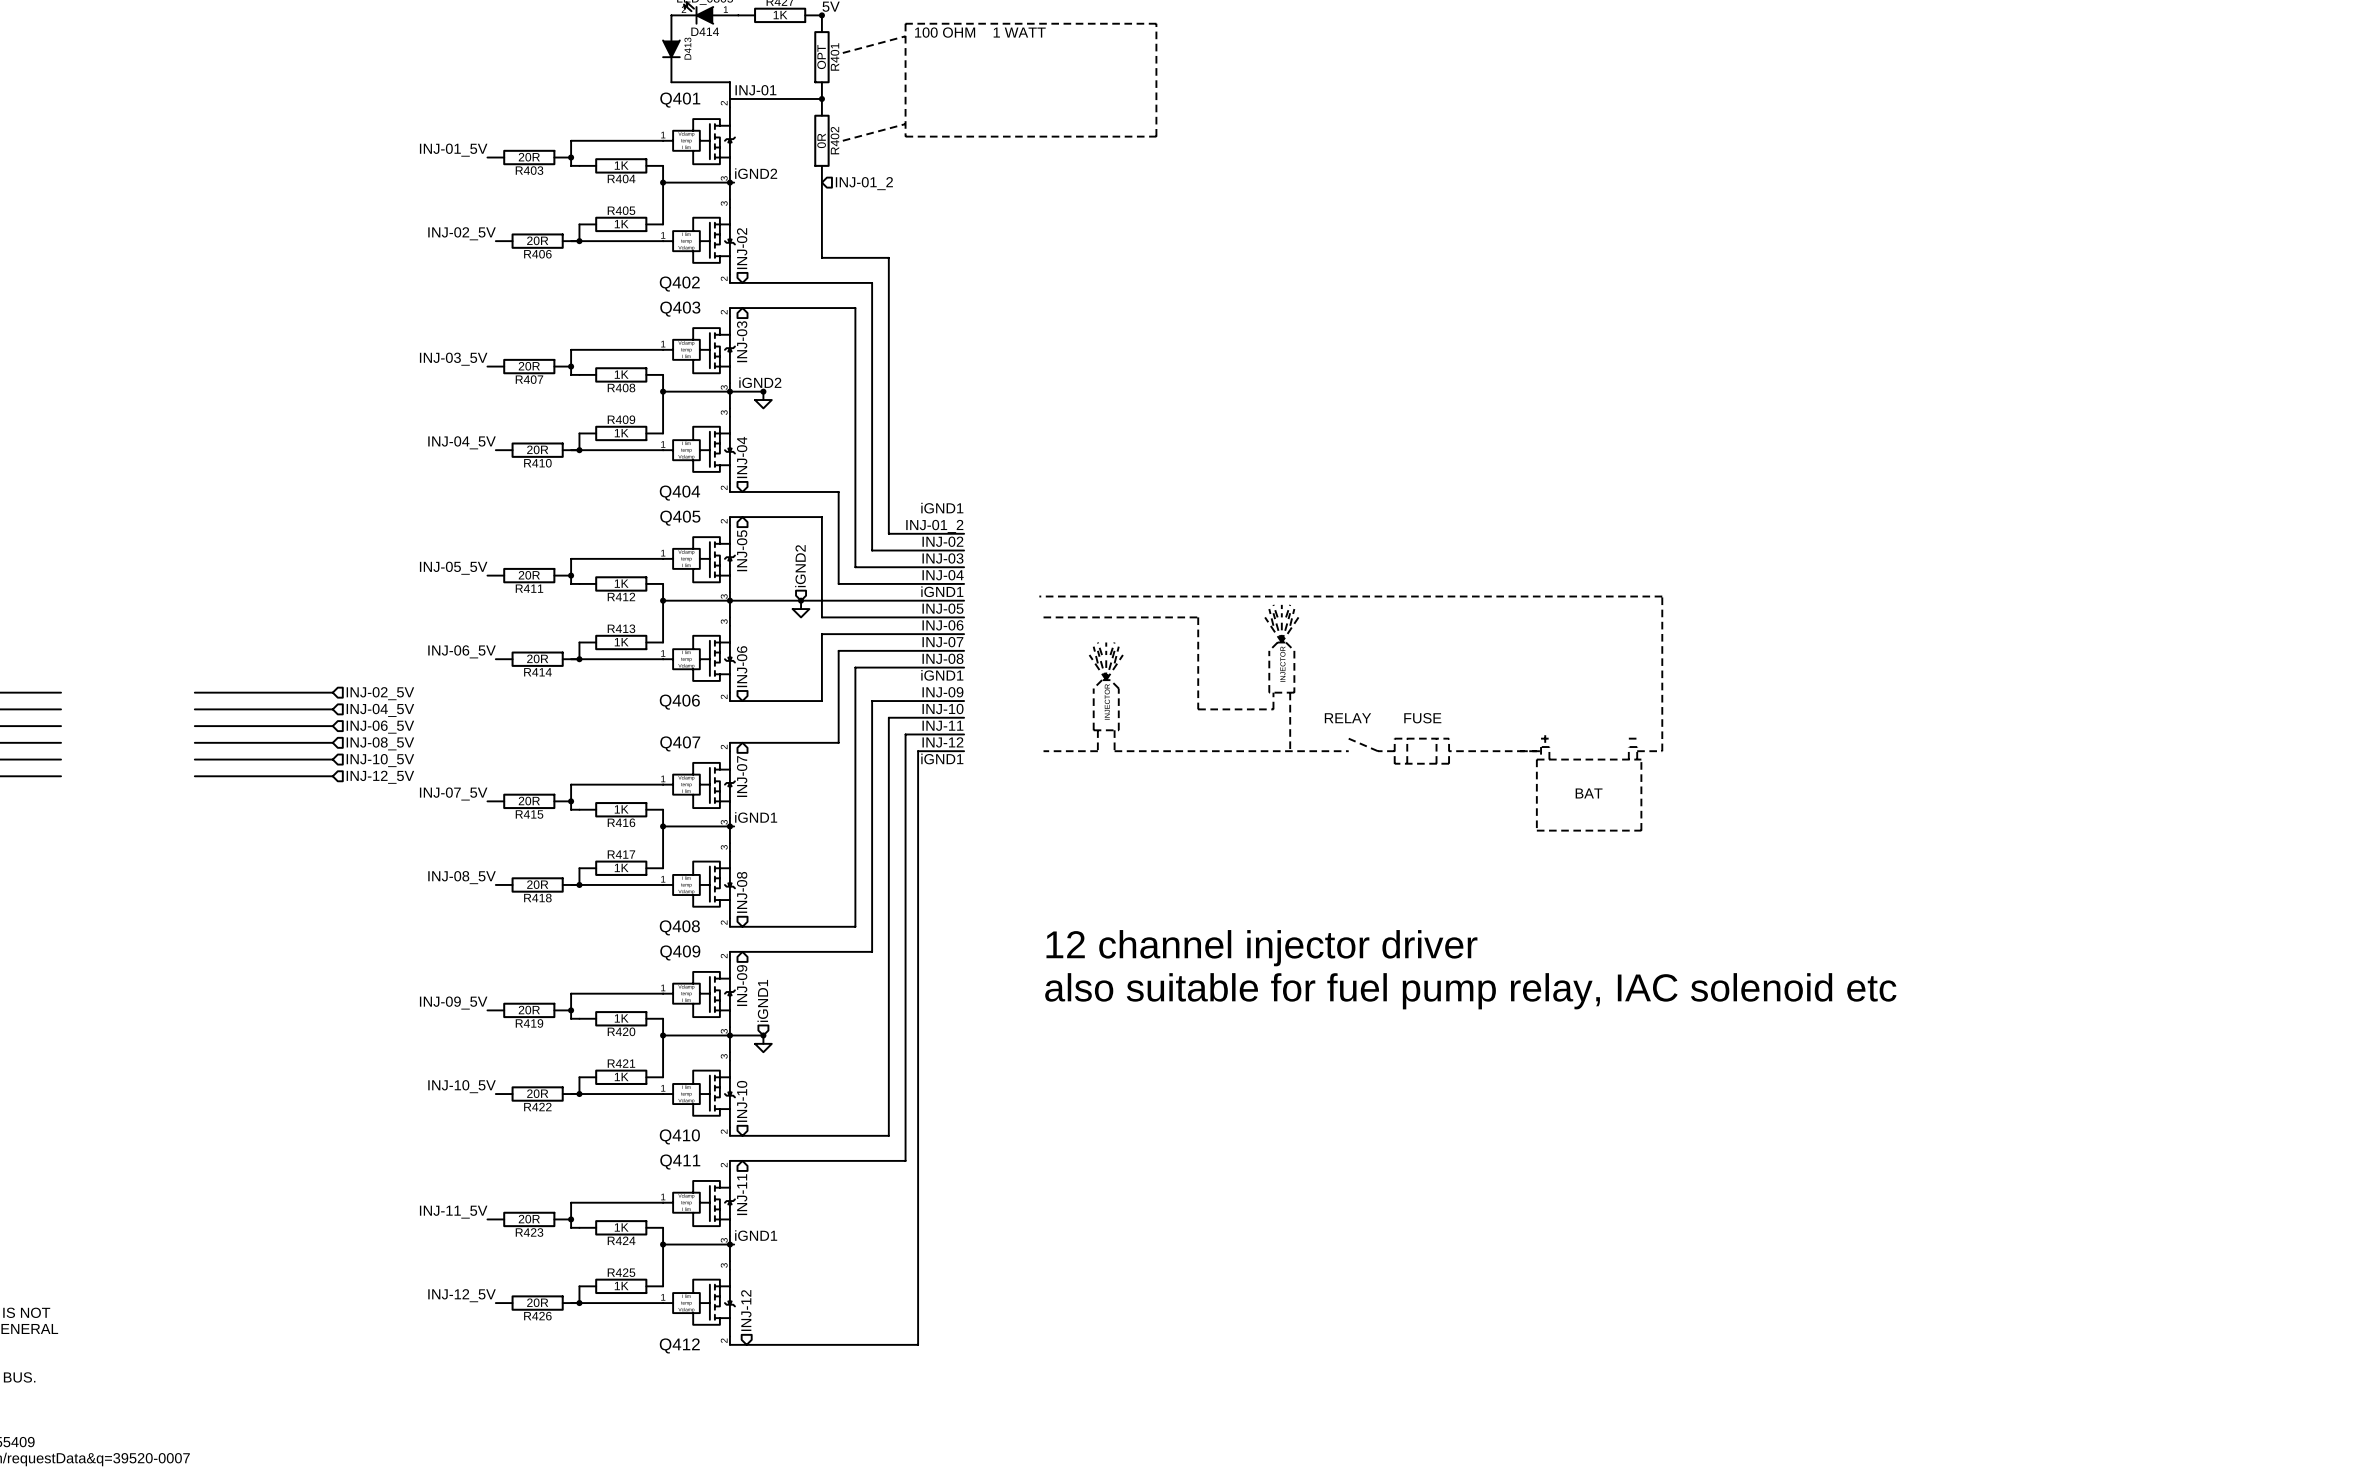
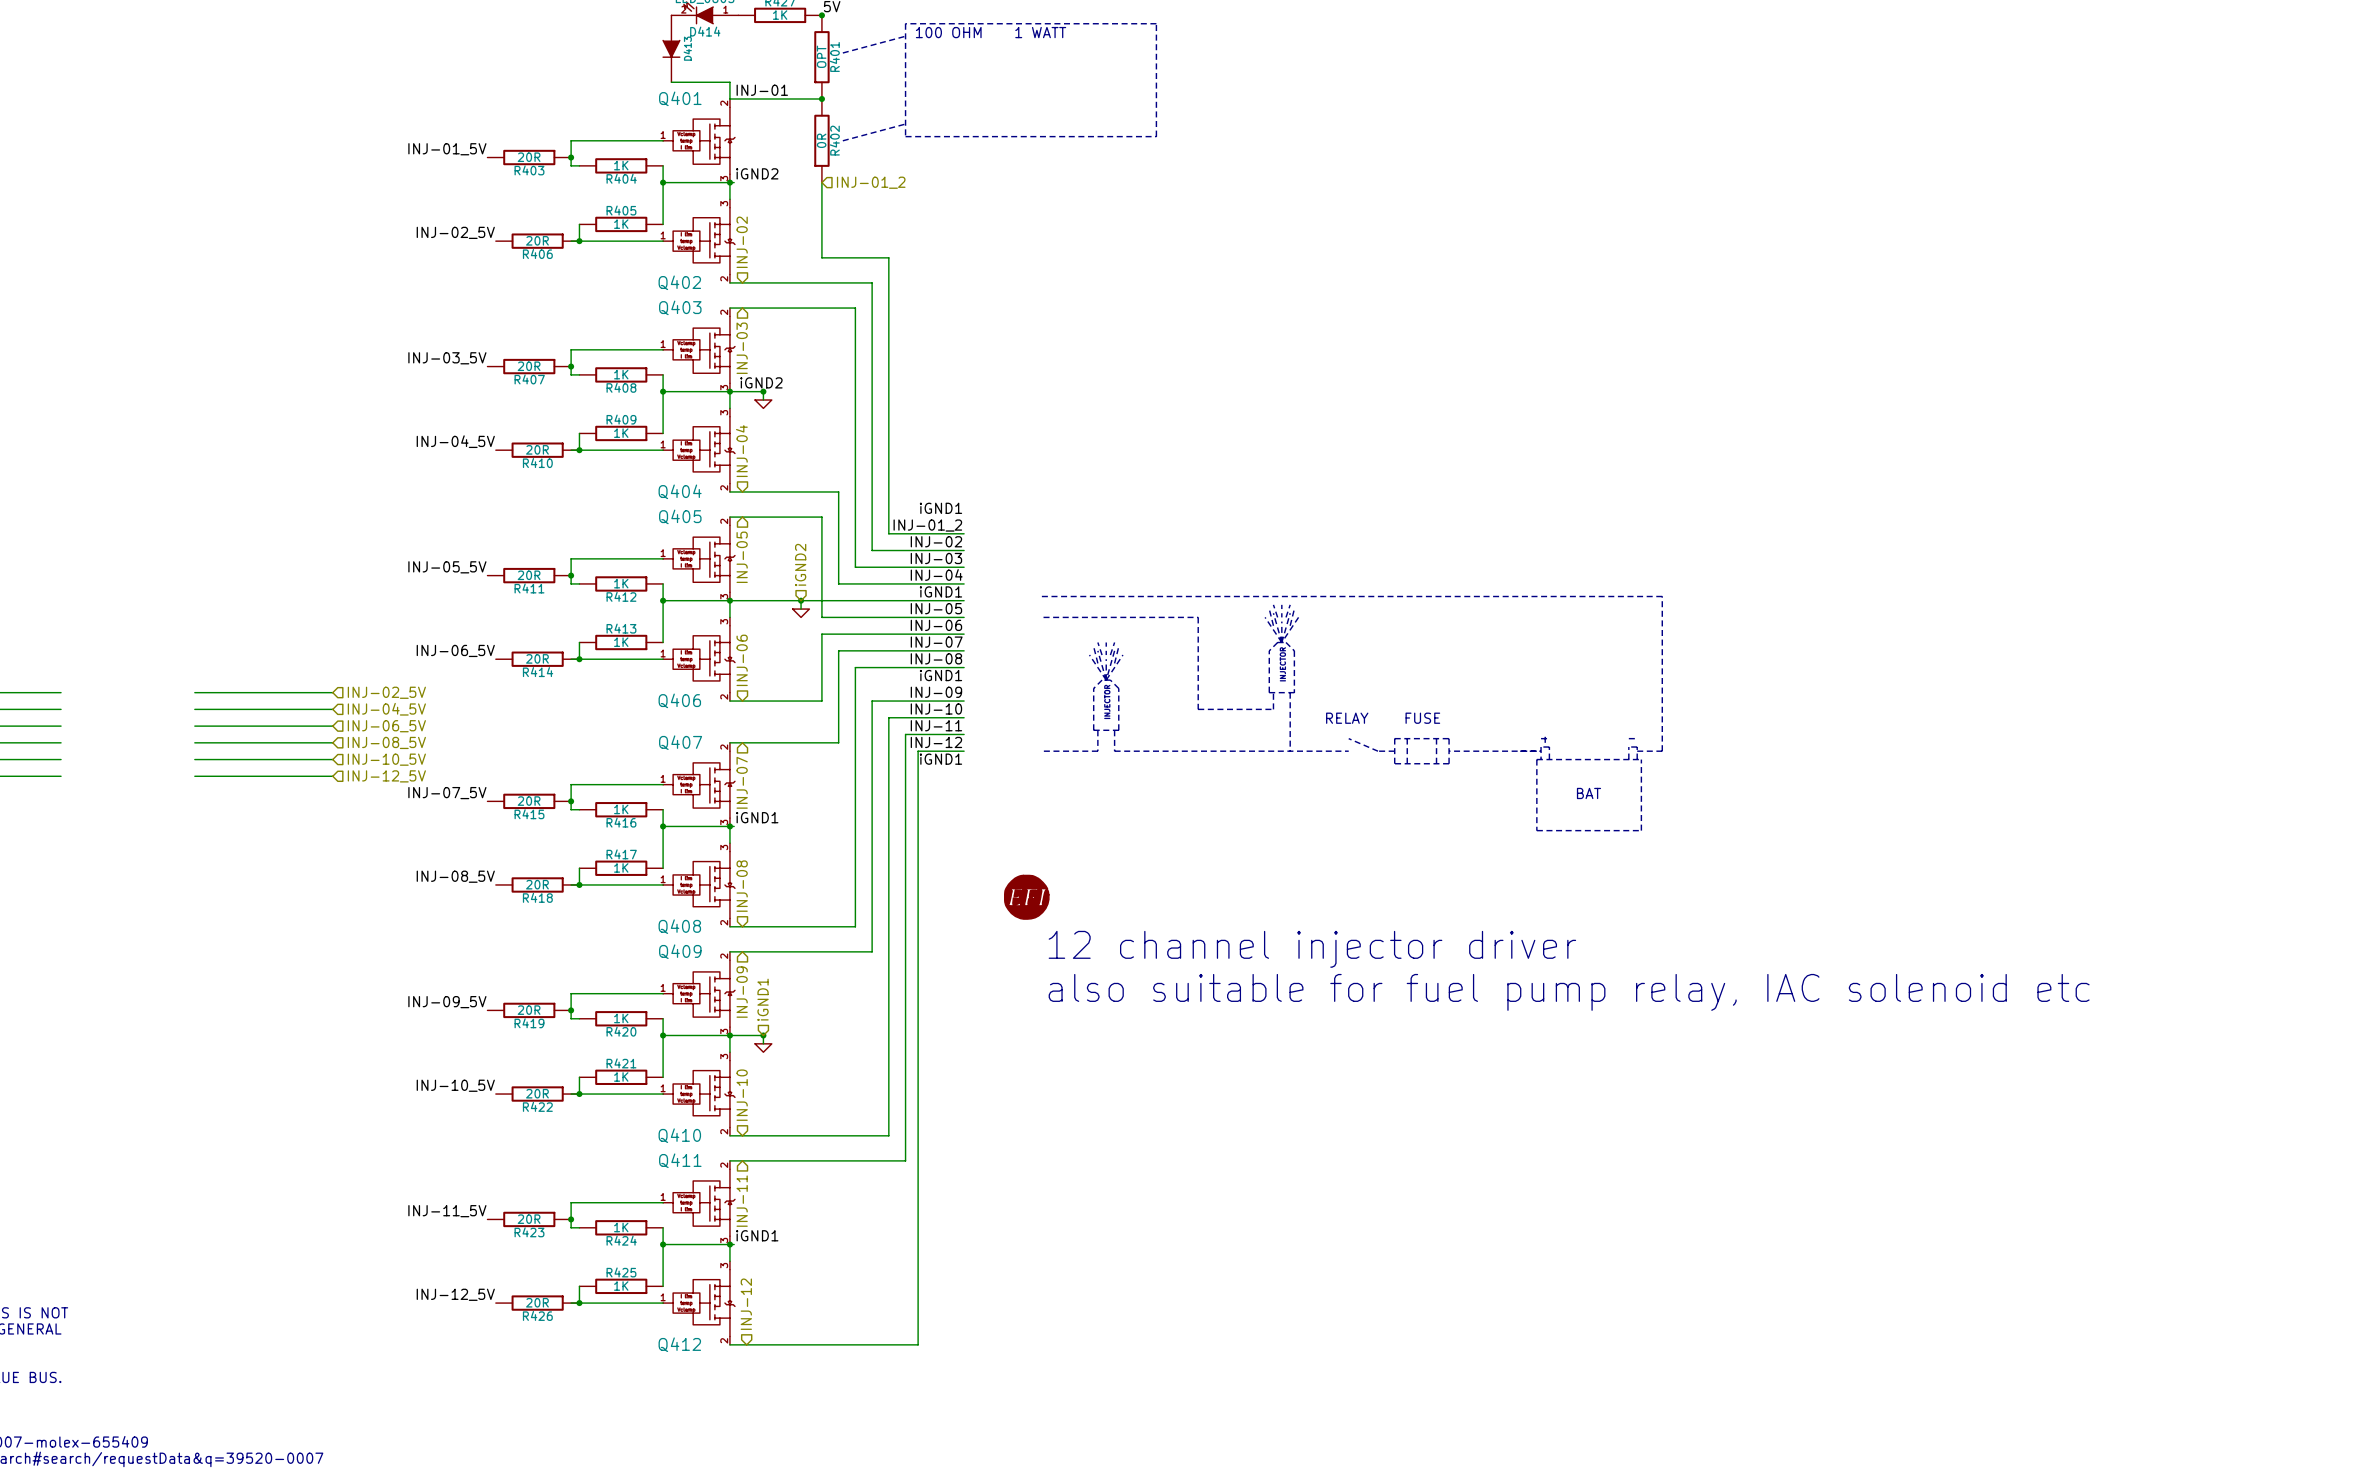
power symbol: none -> (1026, 897)

